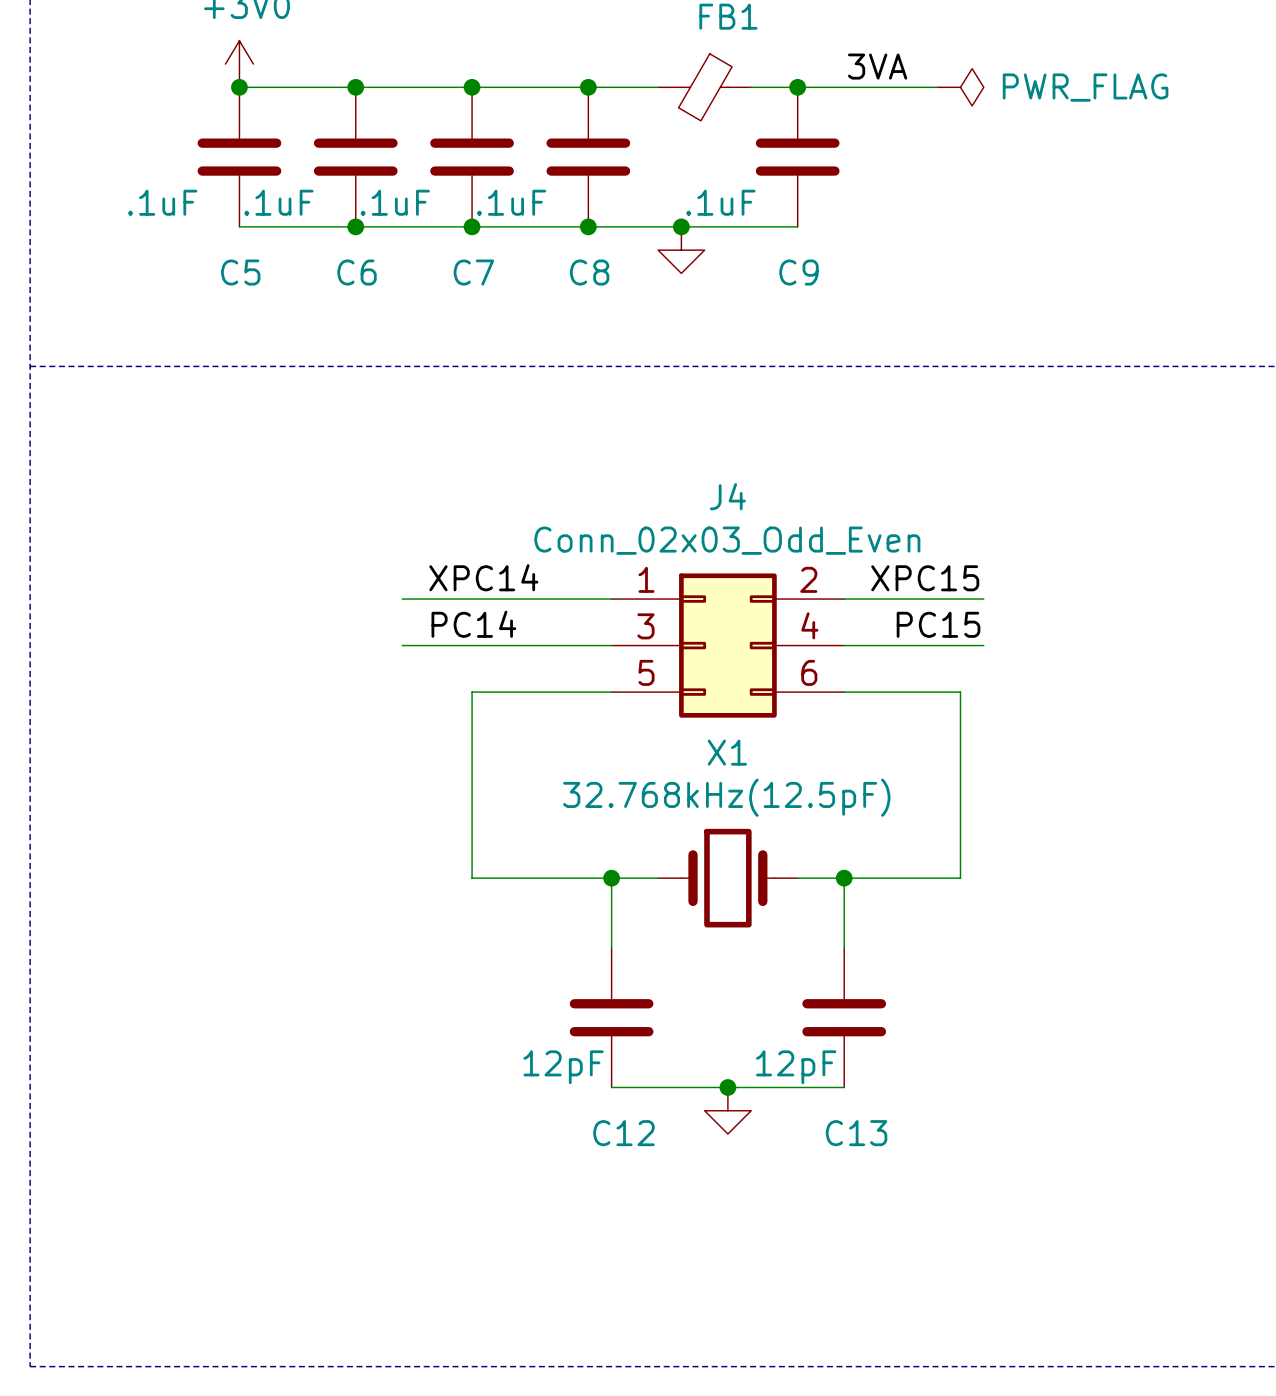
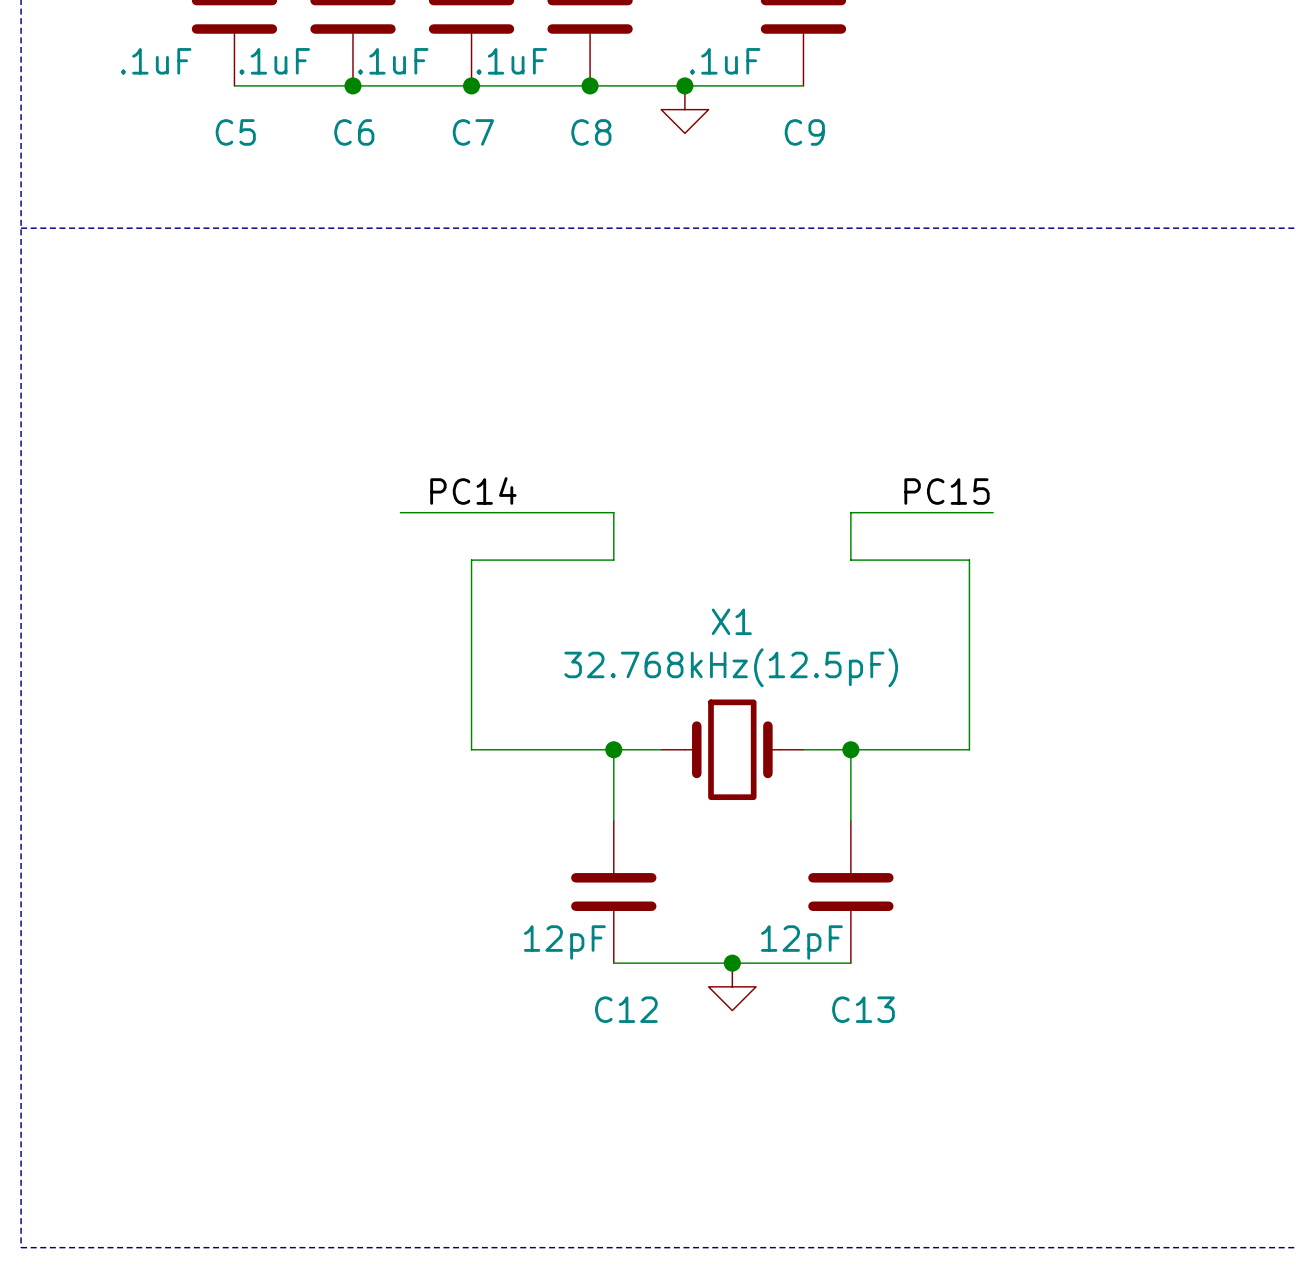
label: XPC14 (483, 577) -> none
label: XPC15 (925, 578) -> none
wire: (402, 599) (611, 599) -> none
wire: (844, 599) (983, 599) -> none
wire: none -> (613, 512) (613, 560)
J4: Conn_02x03_Odd_Even (727, 645) -> none
wire: none -> (850, 512) (850, 560)

